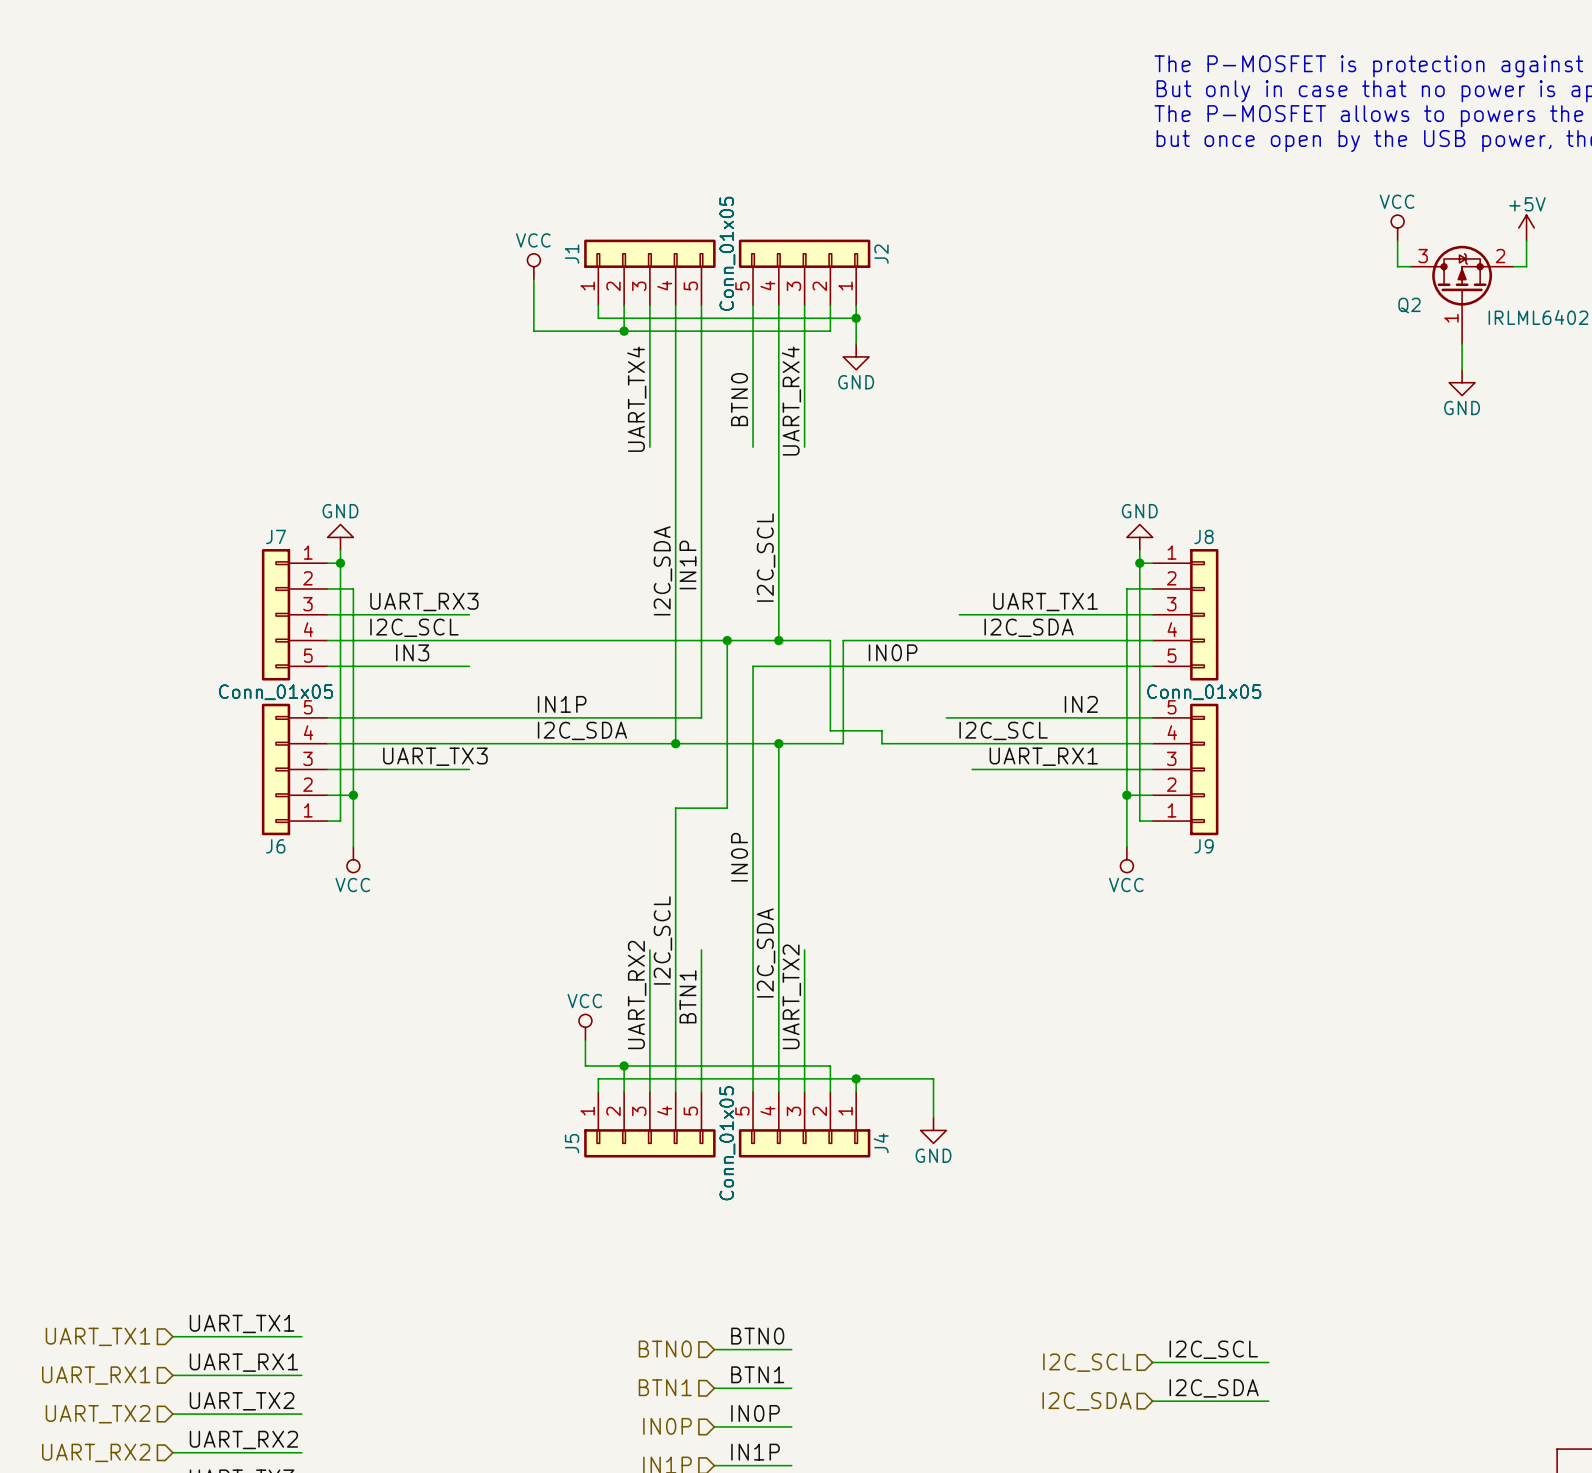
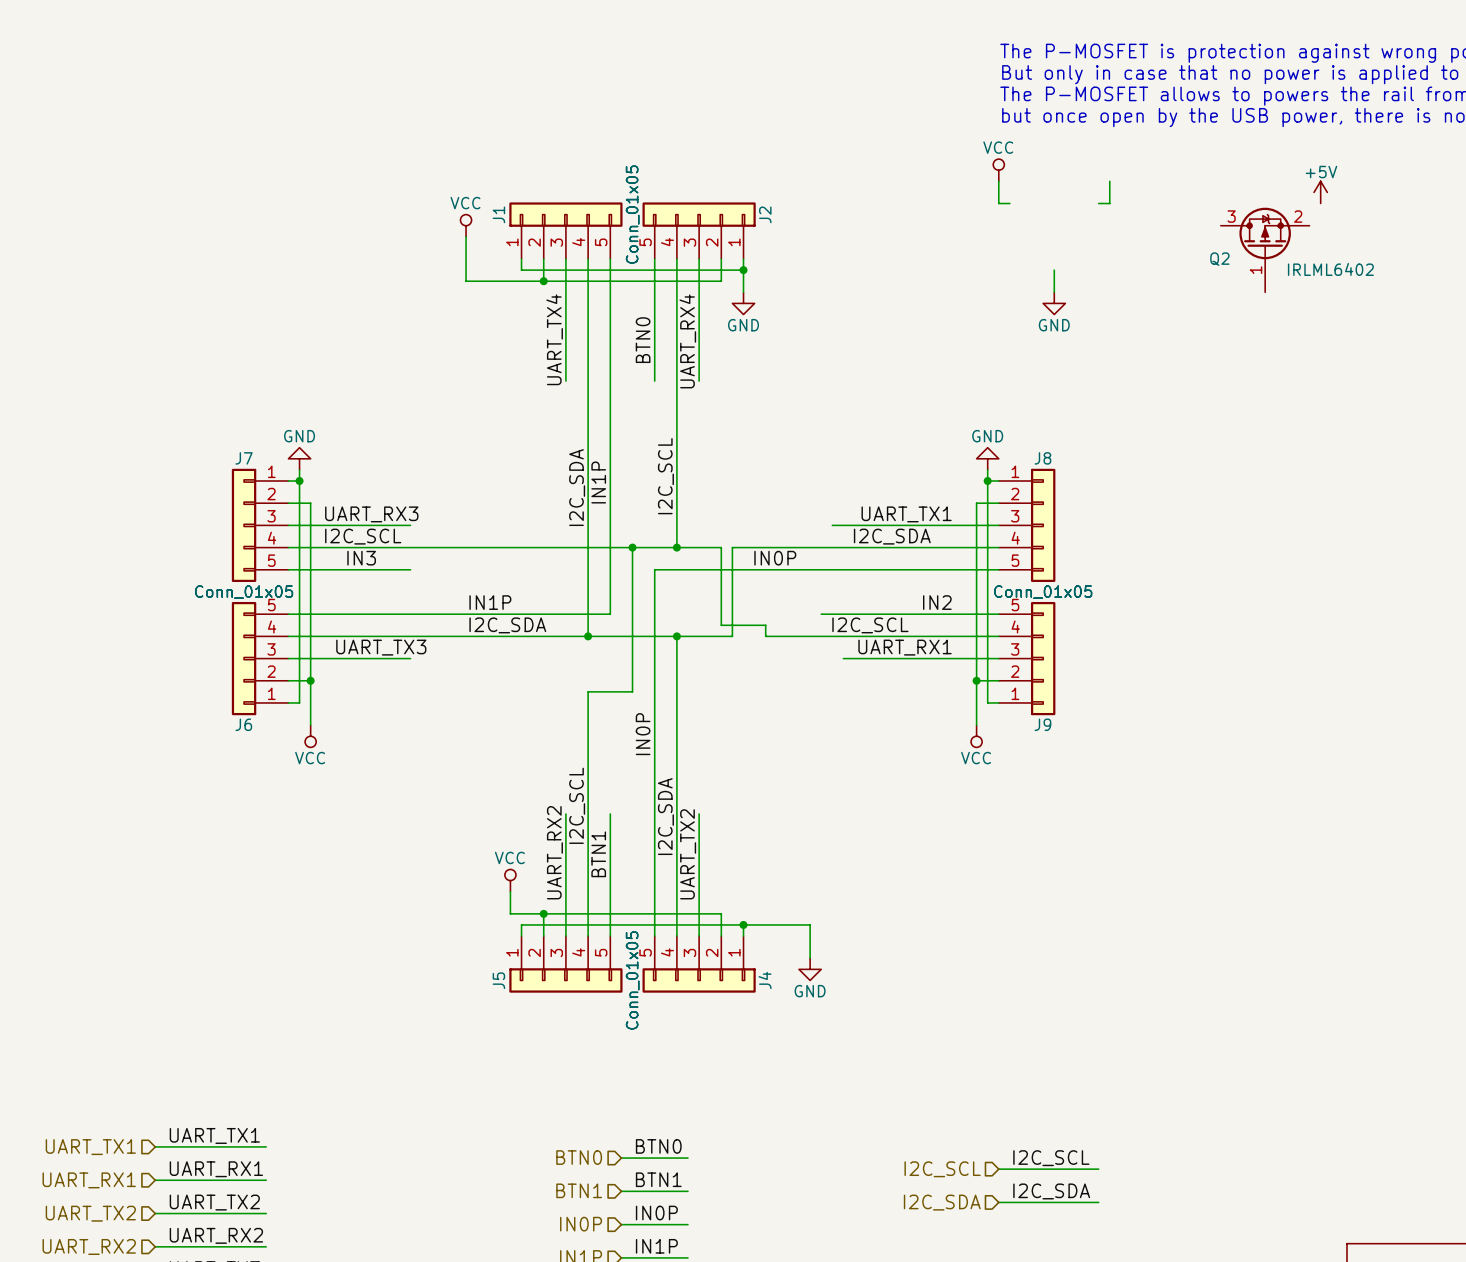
power symbol position: VCC (1397, 228) -> VCC (998, 170)
wire: (1397, 240) (1397, 266) (1410, 266) -> (998, 181) (998, 203) (1009, 203)
wire: (1526, 240) (1526, 266) (1513, 266) -> (1109, 181) (1109, 203) (1098, 203)
wire: (1462, 344) (1462, 369) -> (1054, 270) (1054, 292)
power symbol: none -> GND (1054, 303)
power symbol: GND (1462, 382) -> none

